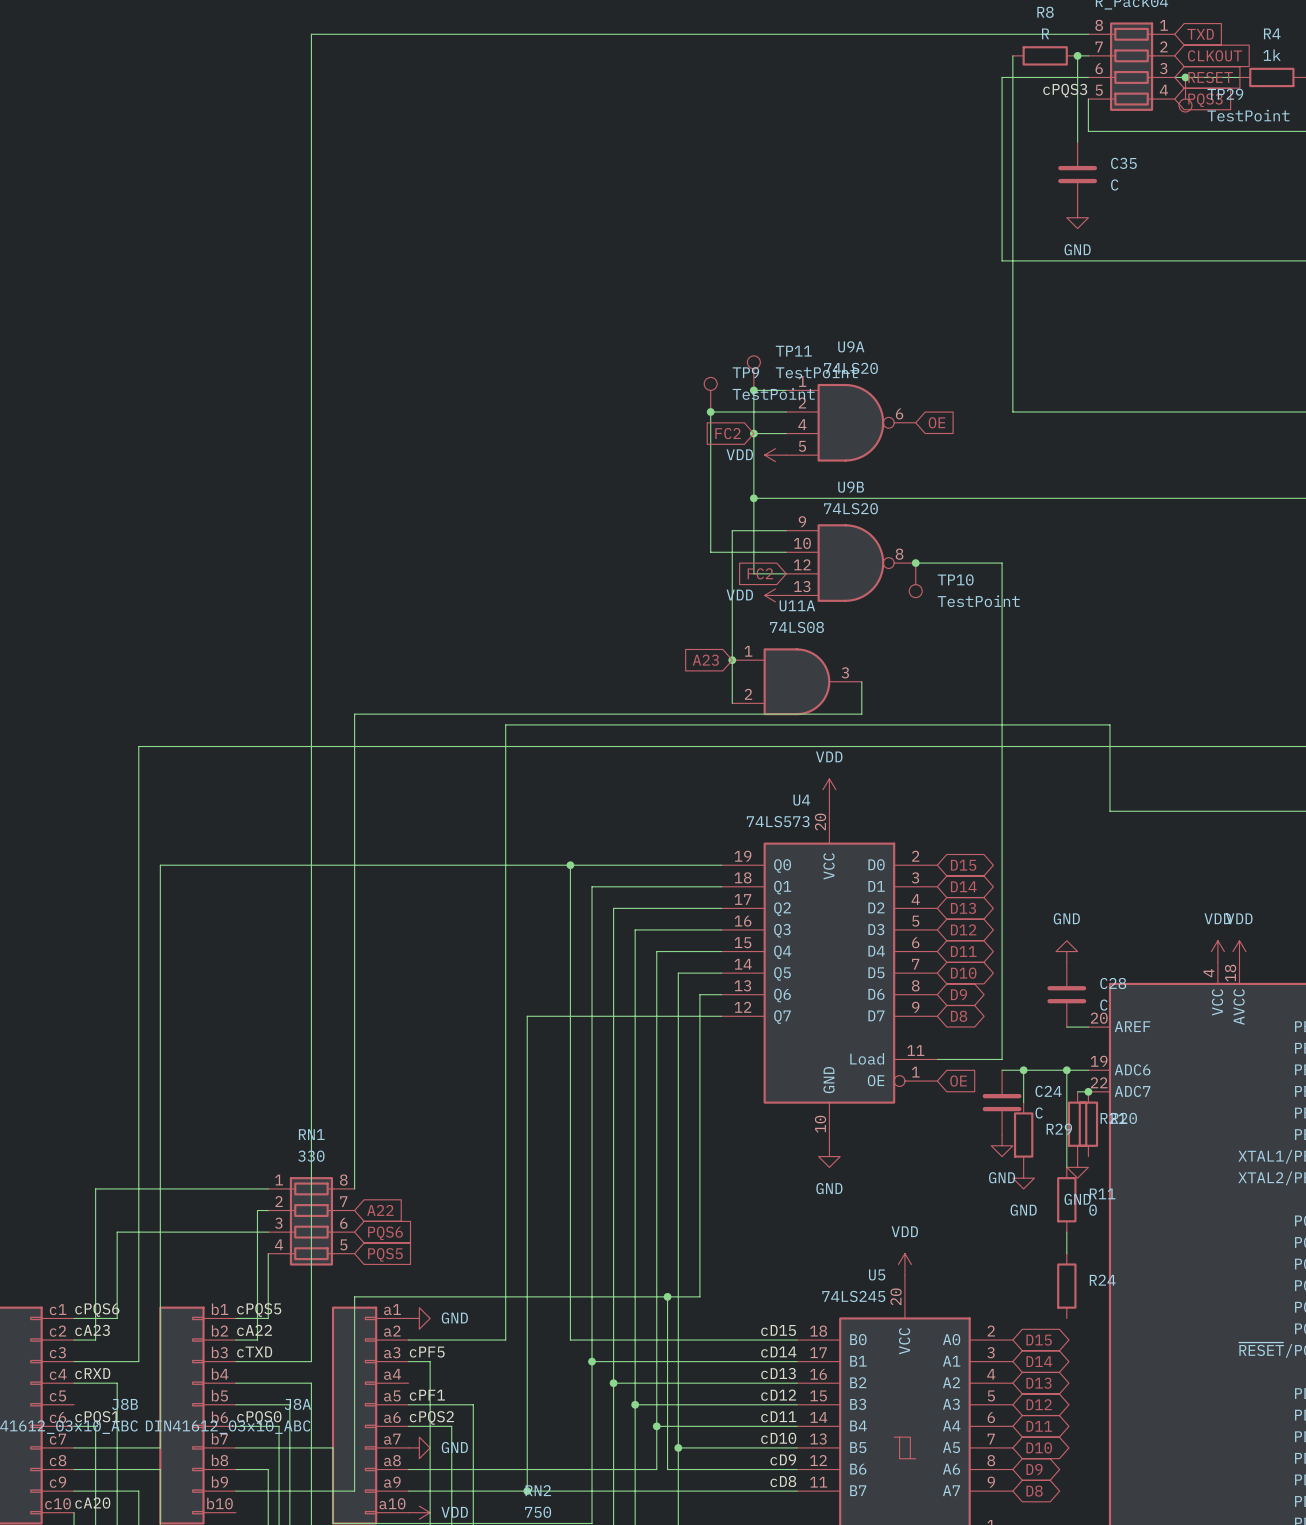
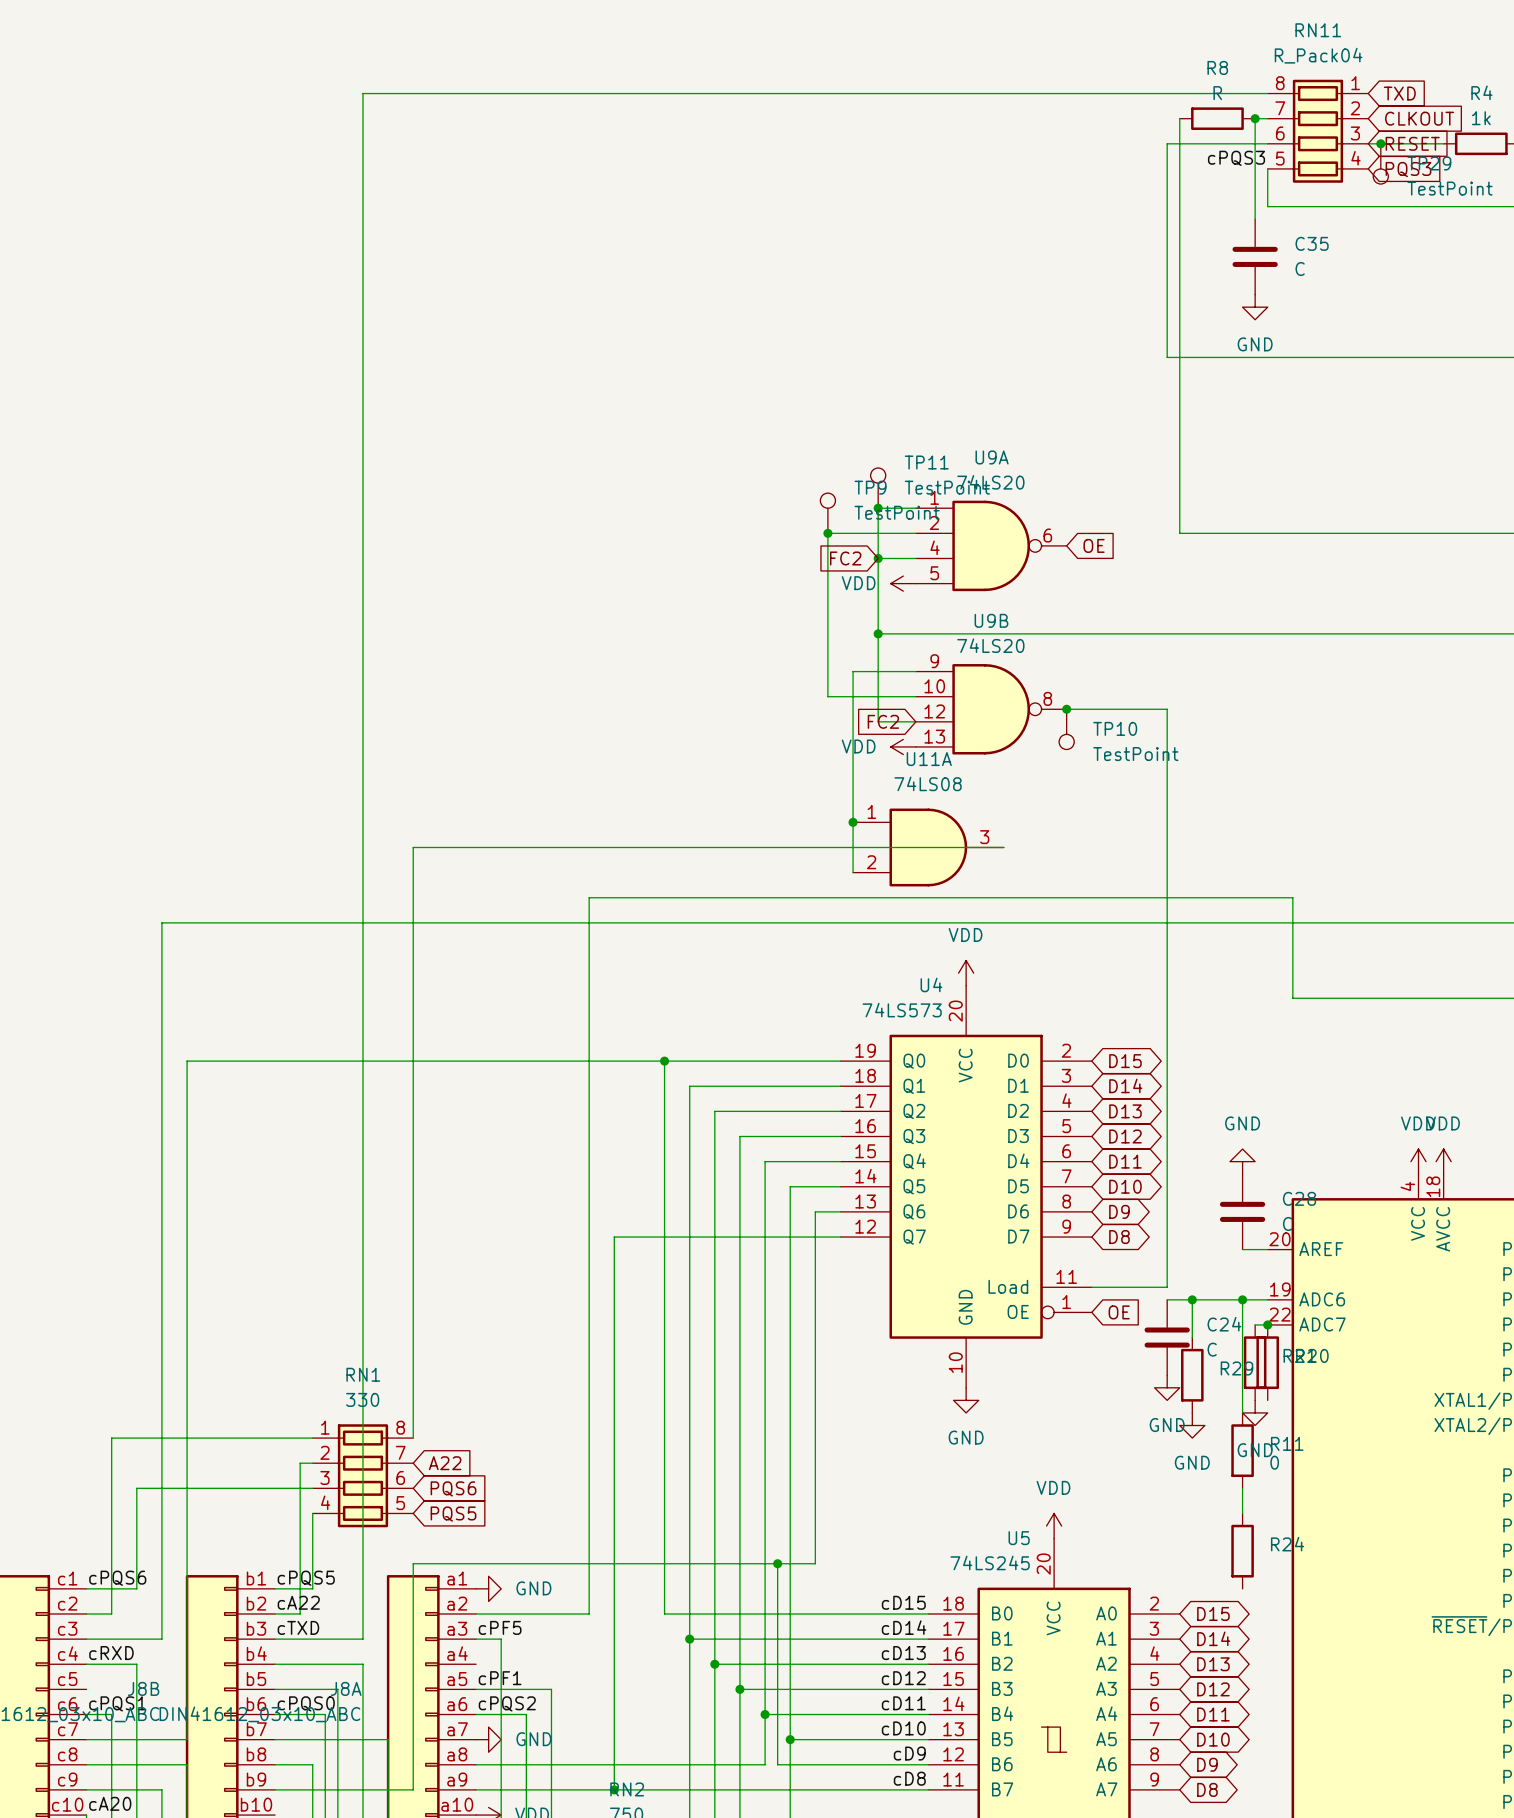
global label: A23 (705, 660) -> none
wire: (861, 681) (861, 714) (354, 714) -> (1003, 847) (413, 847) (413, 885)
label: cA23 (92, 1330) -> none

